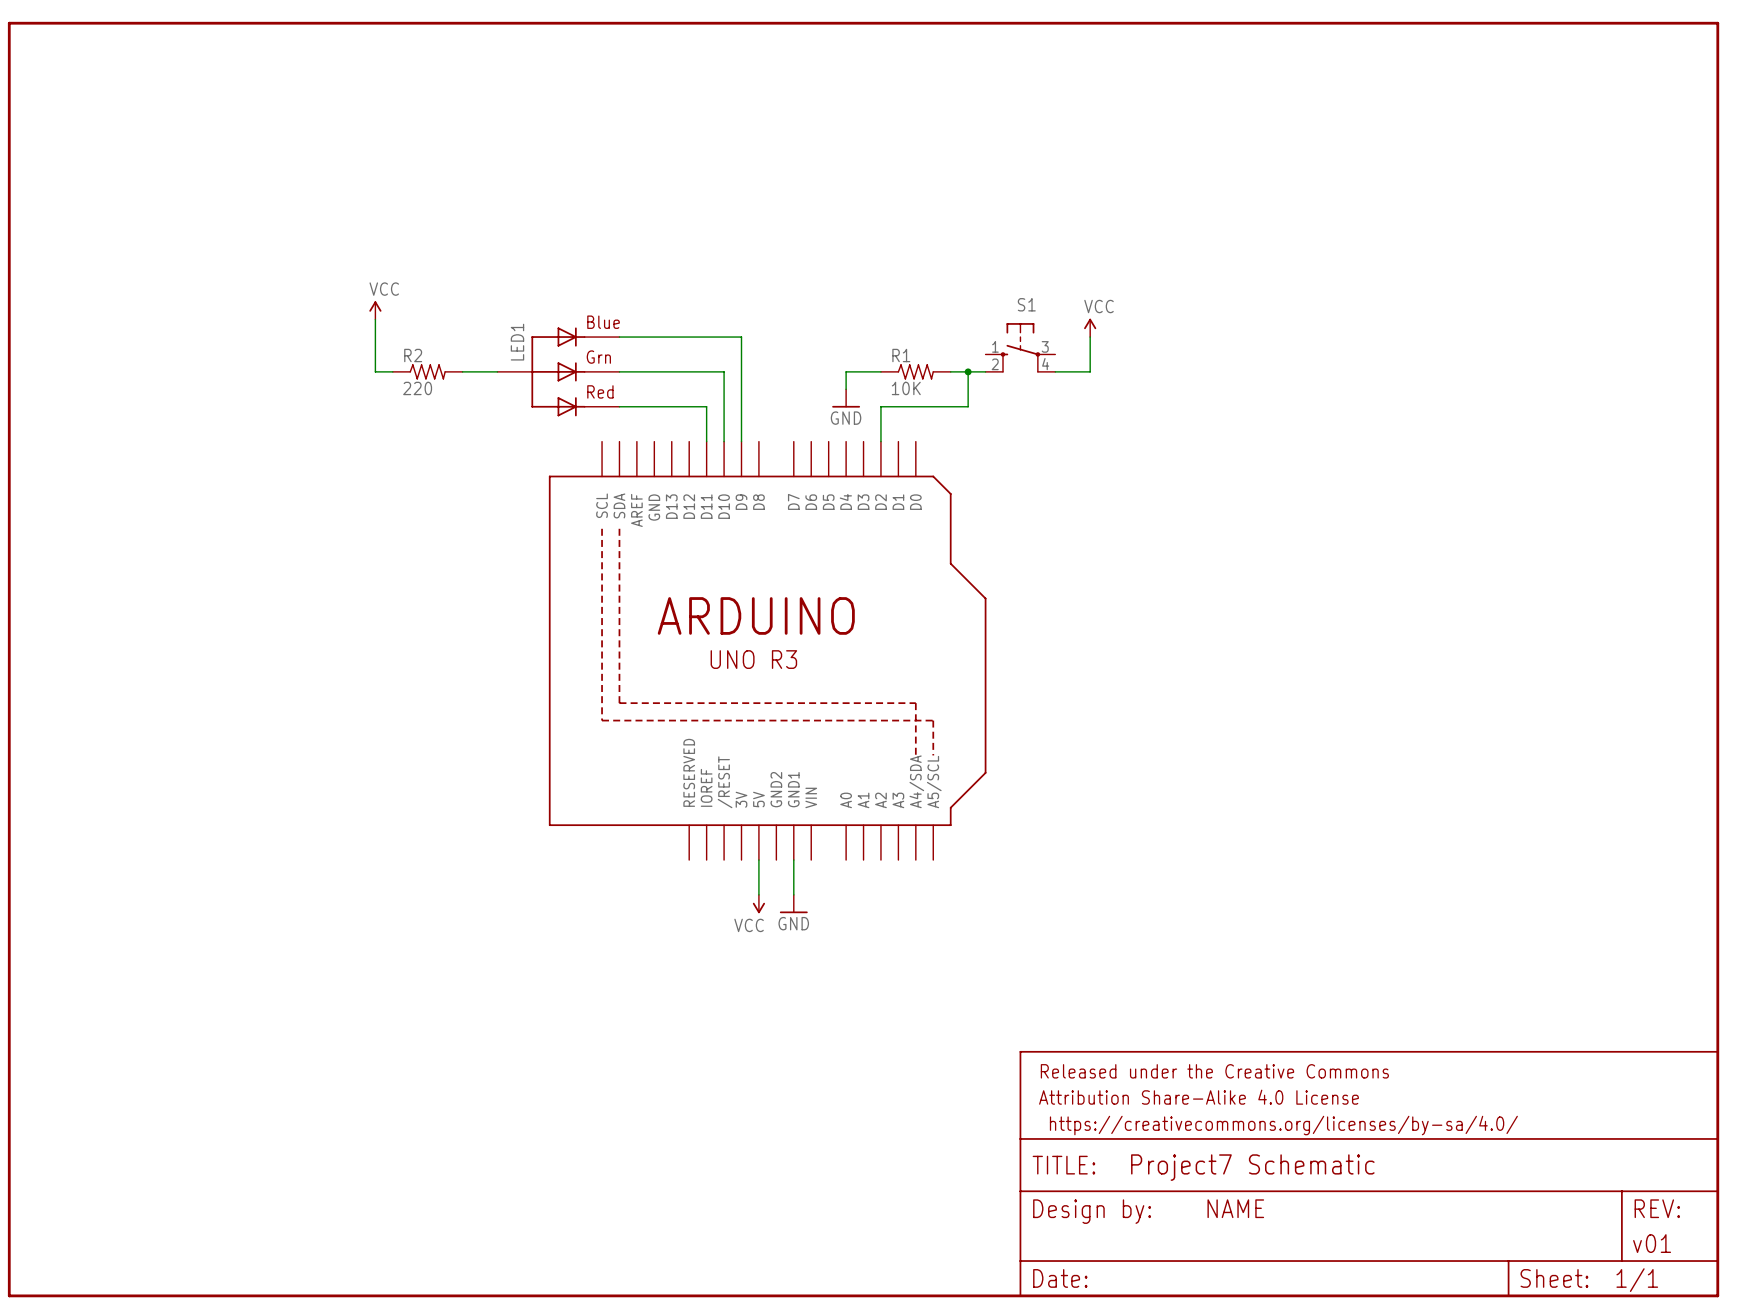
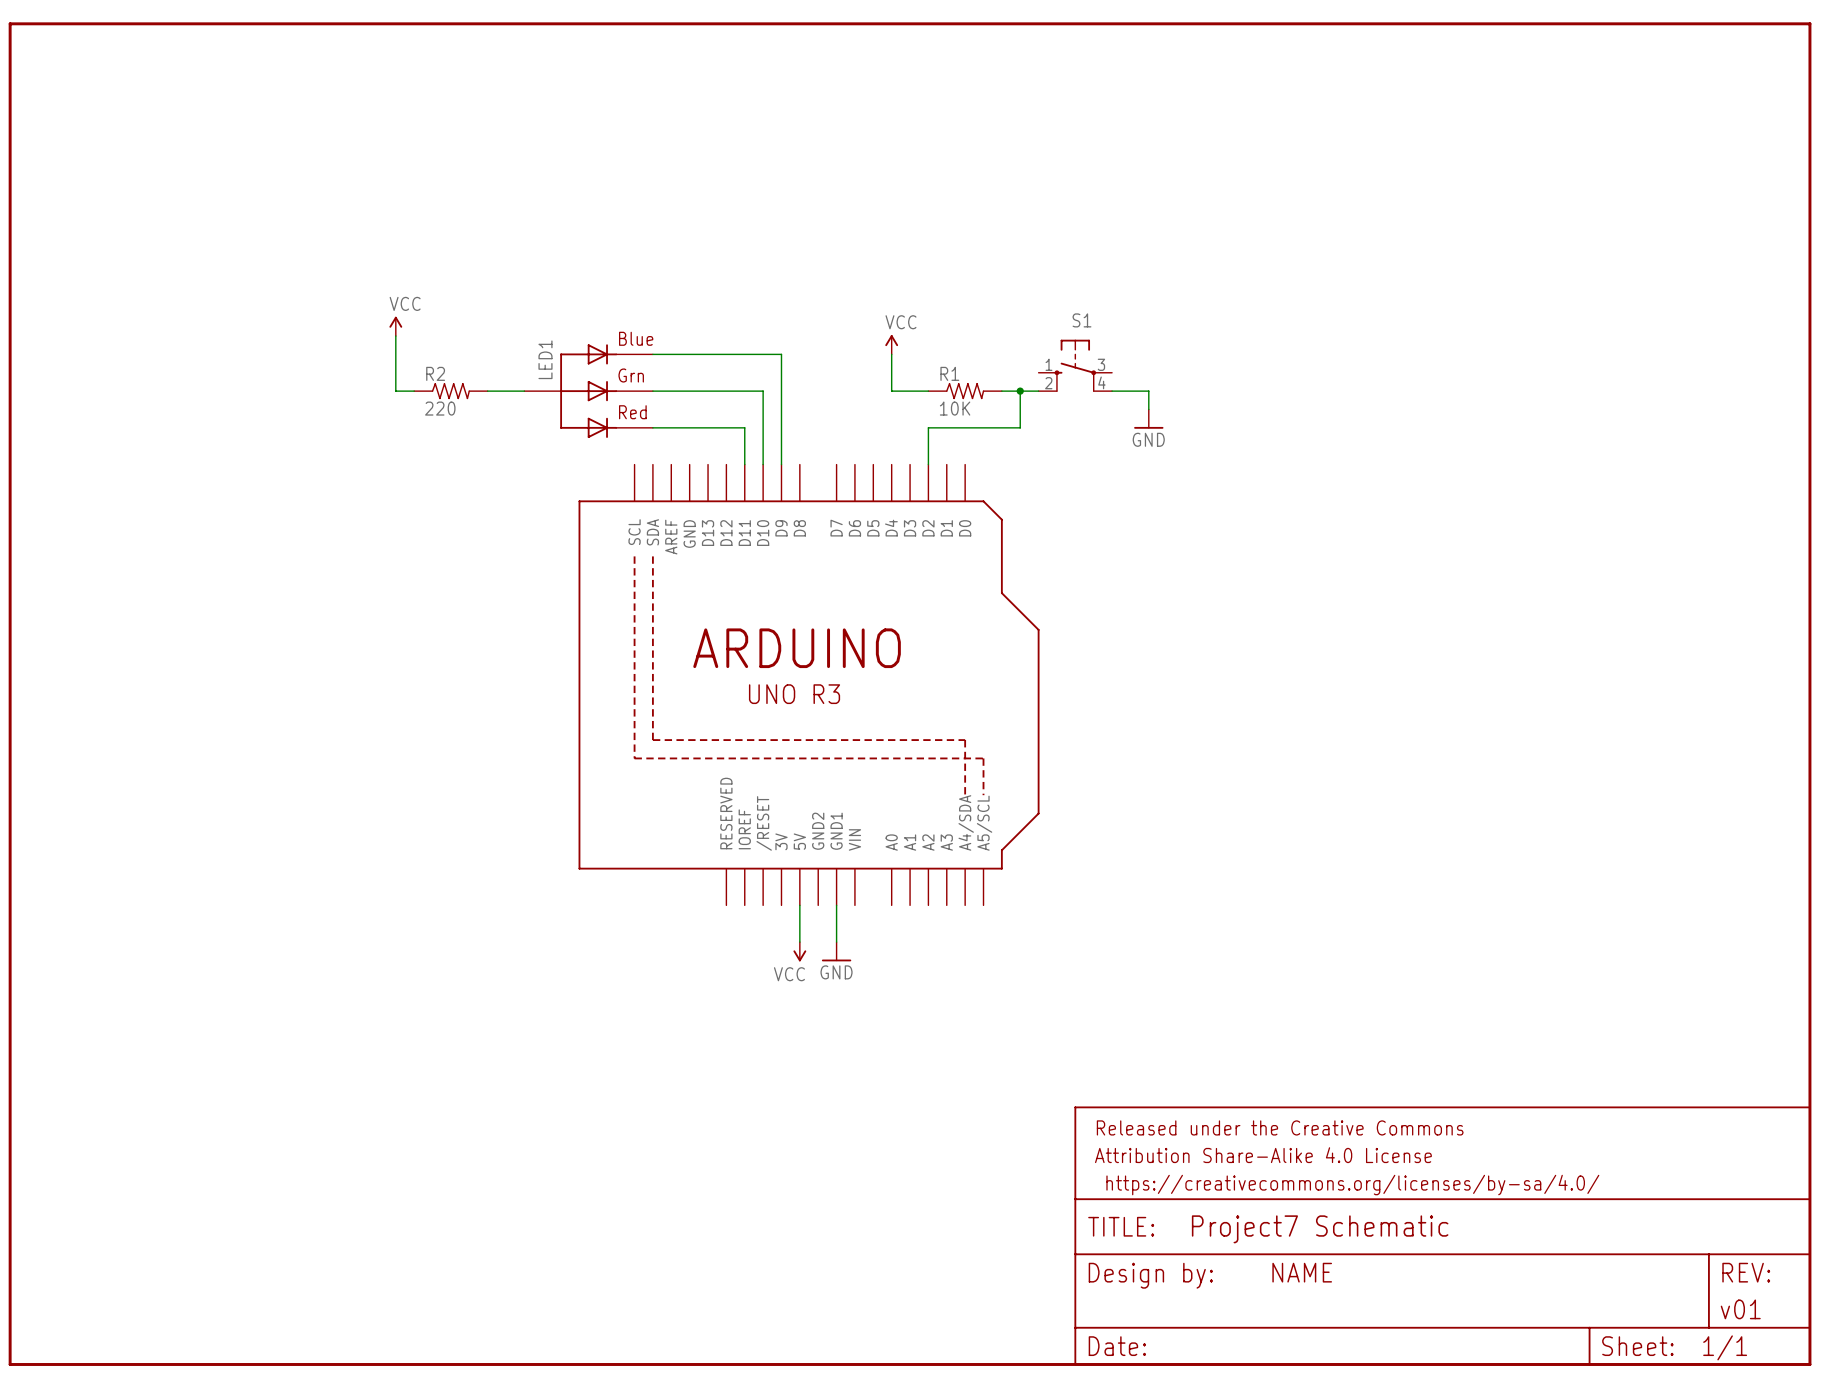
power symbol: none -> VCC (891, 344)
power symbol: VCC (1090, 327) -> none
wire: (1090, 337) (1090, 371) -> (1148, 409) (1148, 391)
wire: (846, 371) (846, 389) -> (891, 391) (891, 354)
power symbol: GND (846, 398) -> none
power symbol: none -> GND (1148, 419)

